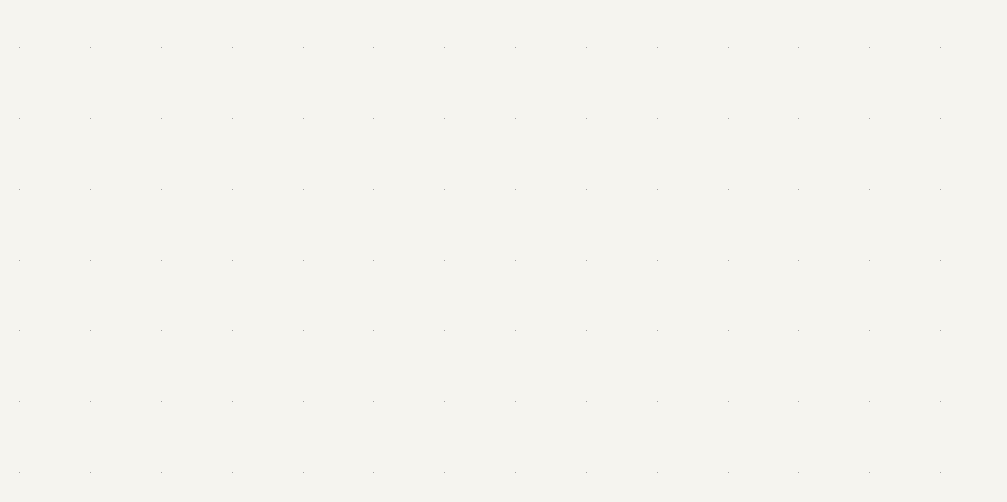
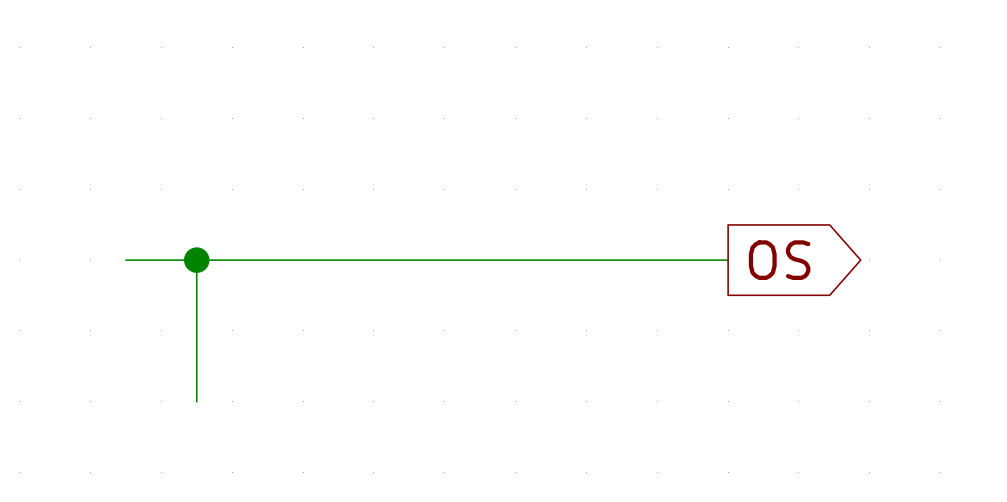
wire: none -> (125, 260) (728, 260)
wire: none -> (196, 260) (196, 401)
junction: none -> (196, 260)
global label: none -> OS (779, 260)

